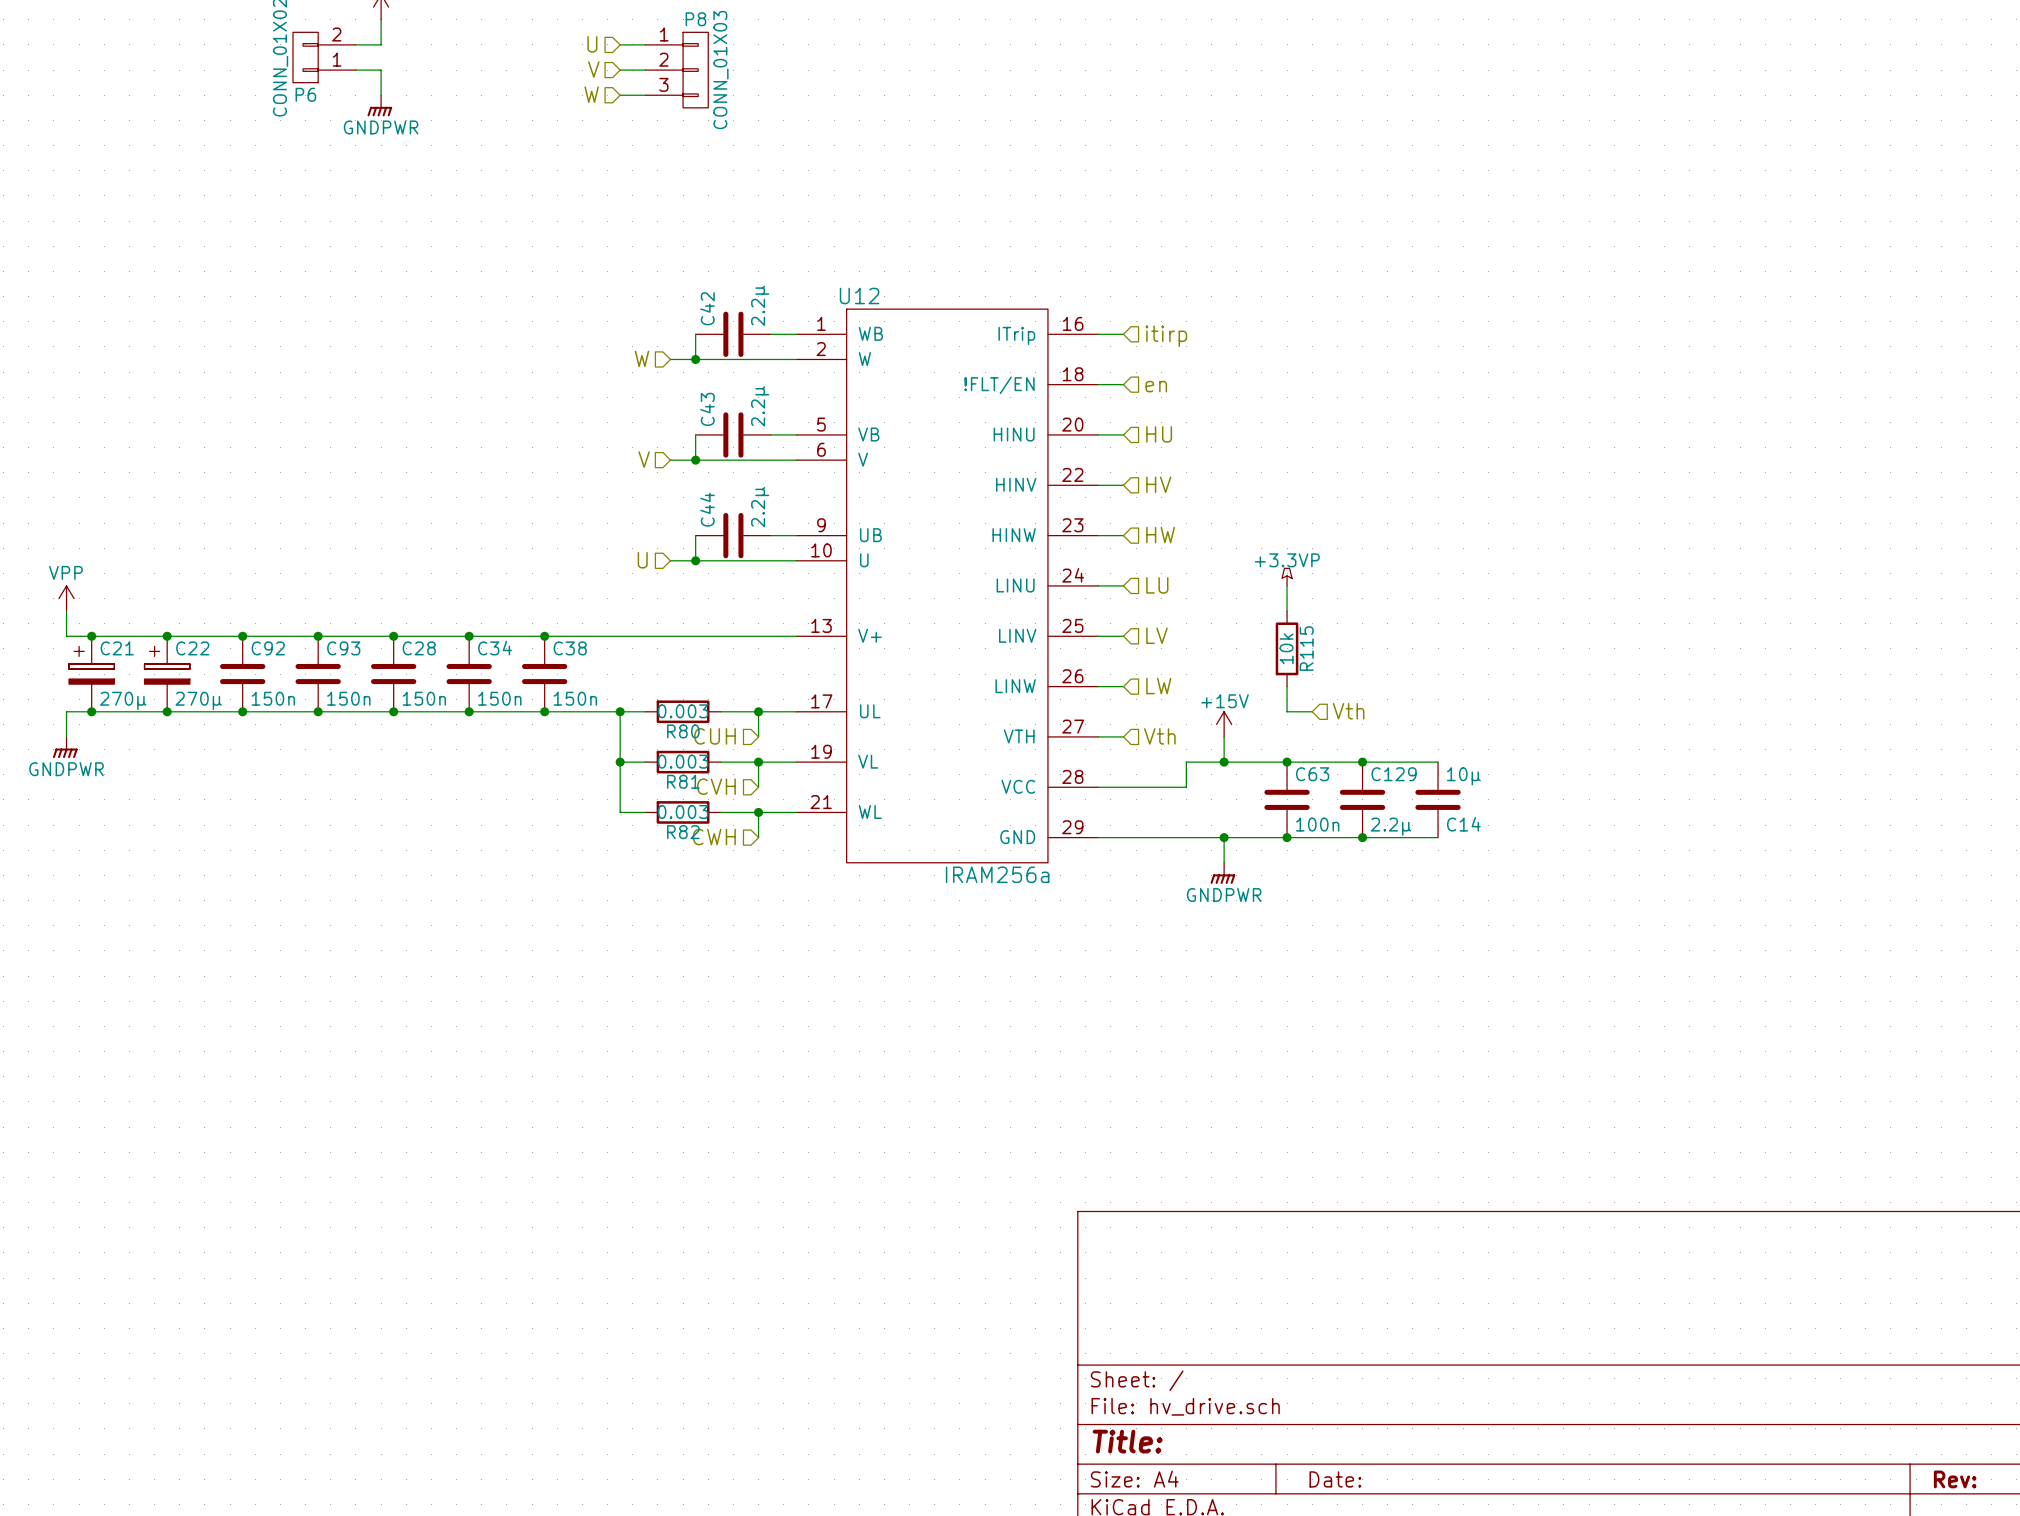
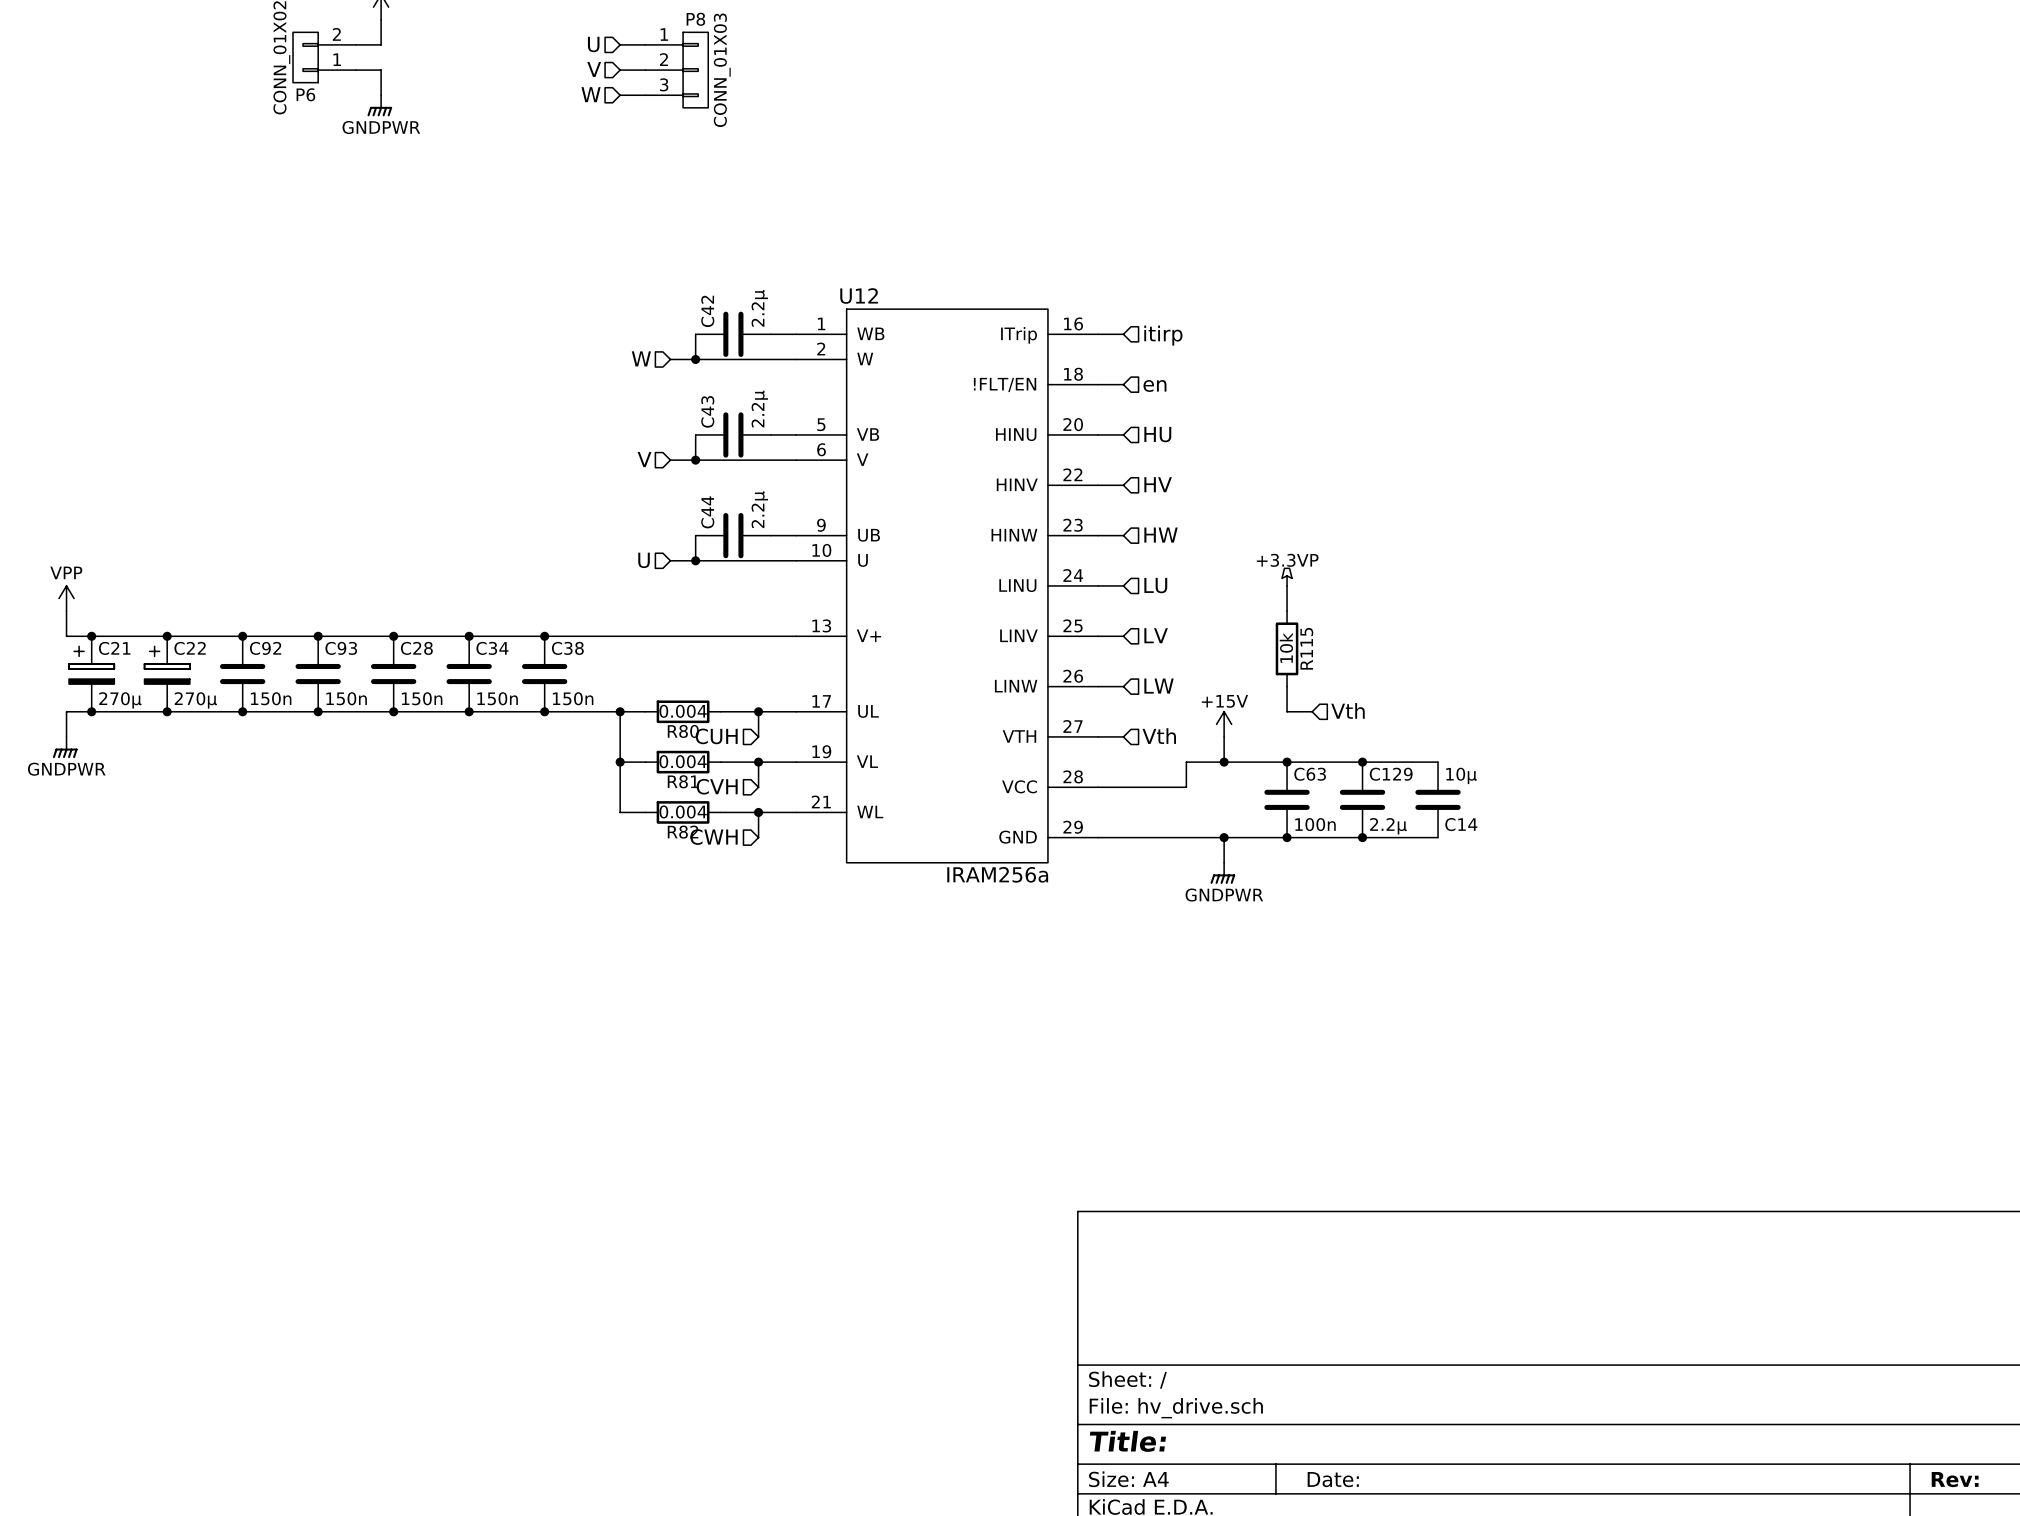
R80 value: 0.003 (683, 711) -> 0.004 (683, 711)
R81 value: 0.003 (683, 761) -> 0.004 (683, 761)
R82 value: 0.003 (683, 811) -> 0.004 (683, 811)

